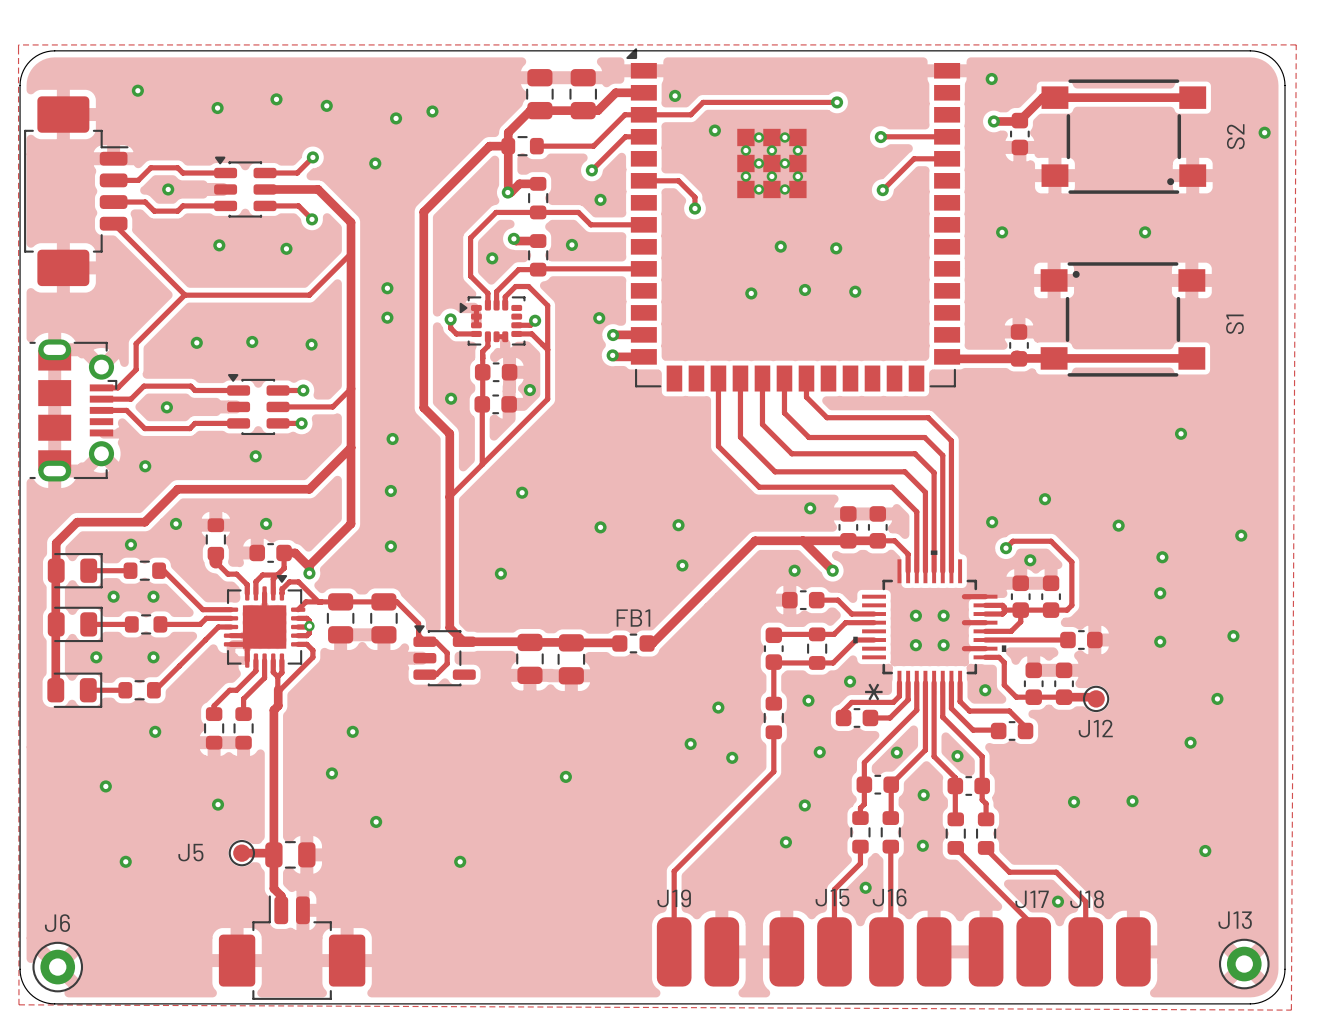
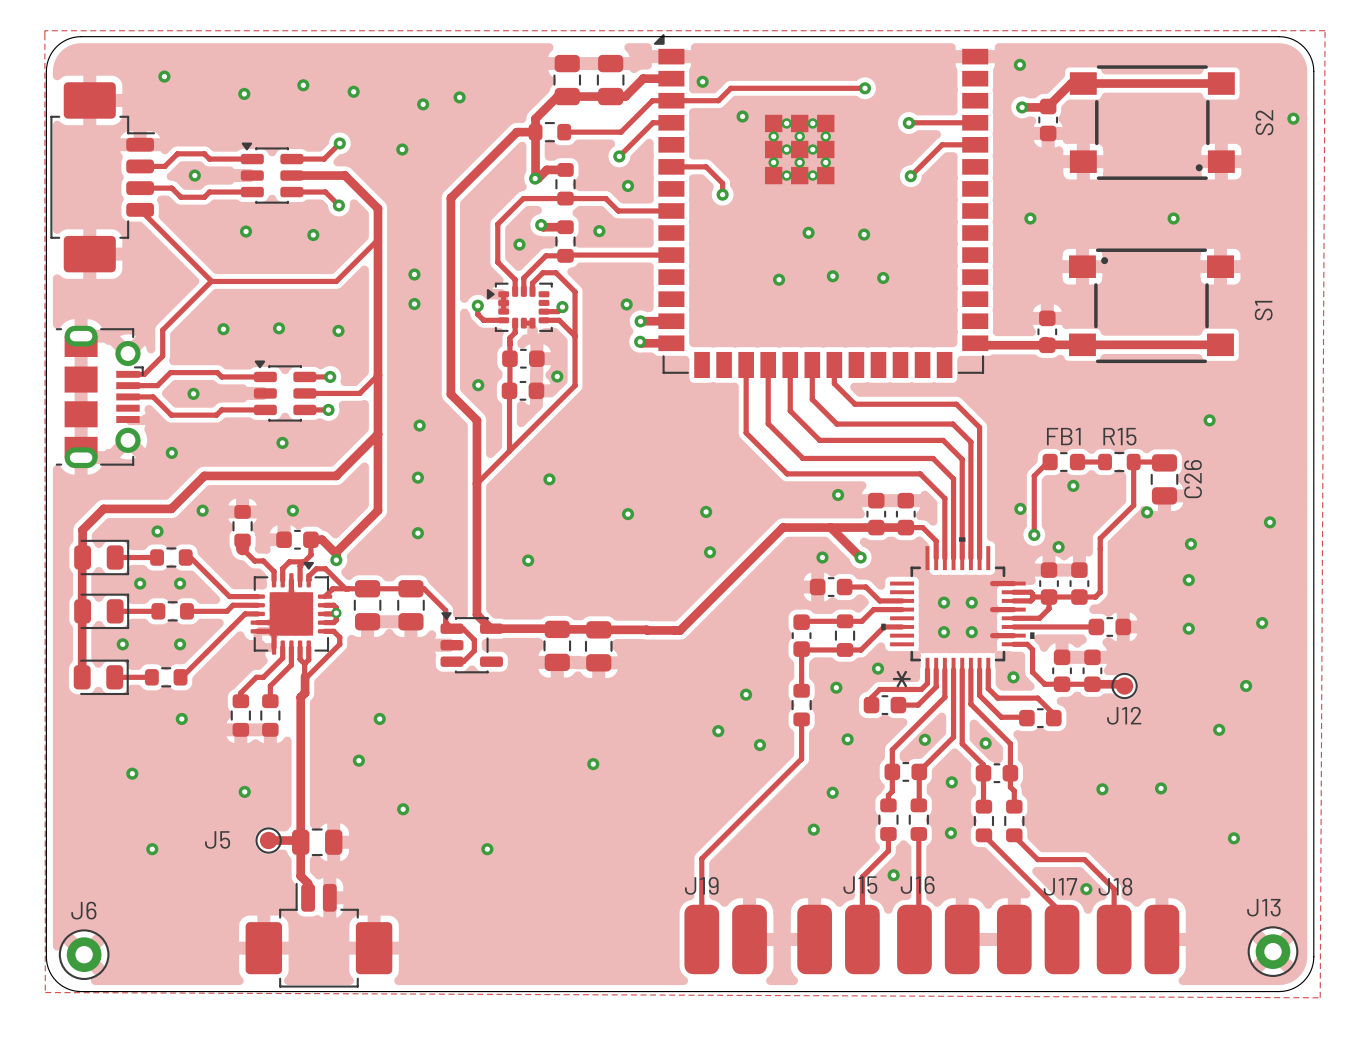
track: none -> (1077, 462) (1105, 462)
R15: none -> (1119, 462)
track: none -> (1164, 462) (1133, 462) (1133, 505) (1100, 538) (1100, 548)
C26: none -> (1164, 479)
track: (1006, 548) (1012, 541) (1051, 541) (1071, 562) -> (1034, 534) (1034, 475) (1050, 462)
track: none -> (647, 630) (674, 630)
FB1 position: (633, 643) -> (1063, 462)

